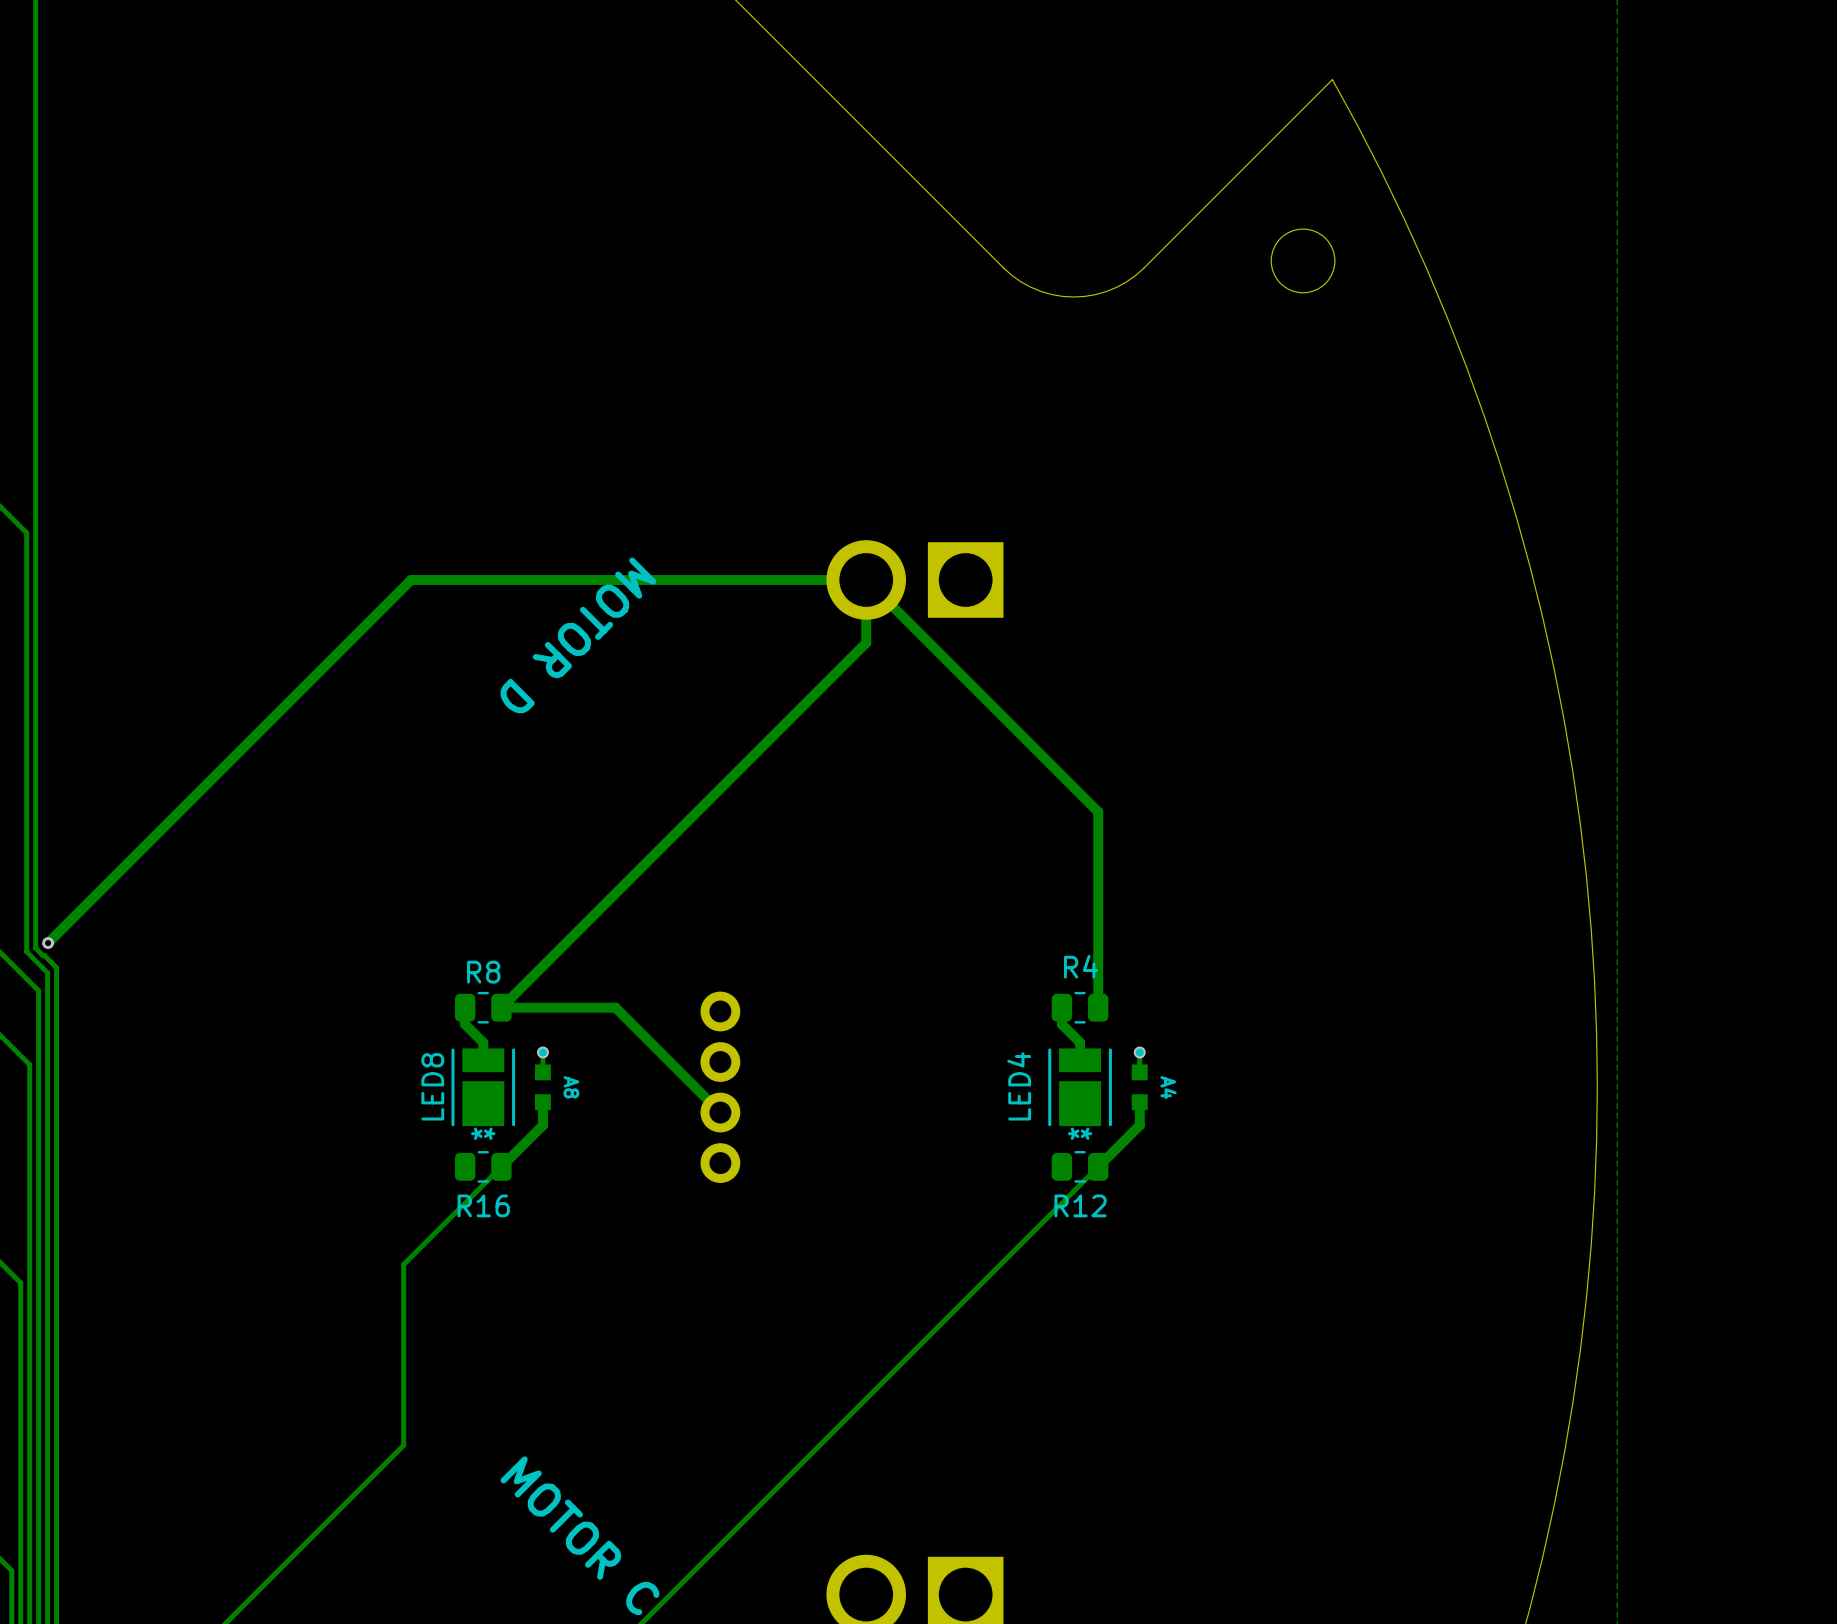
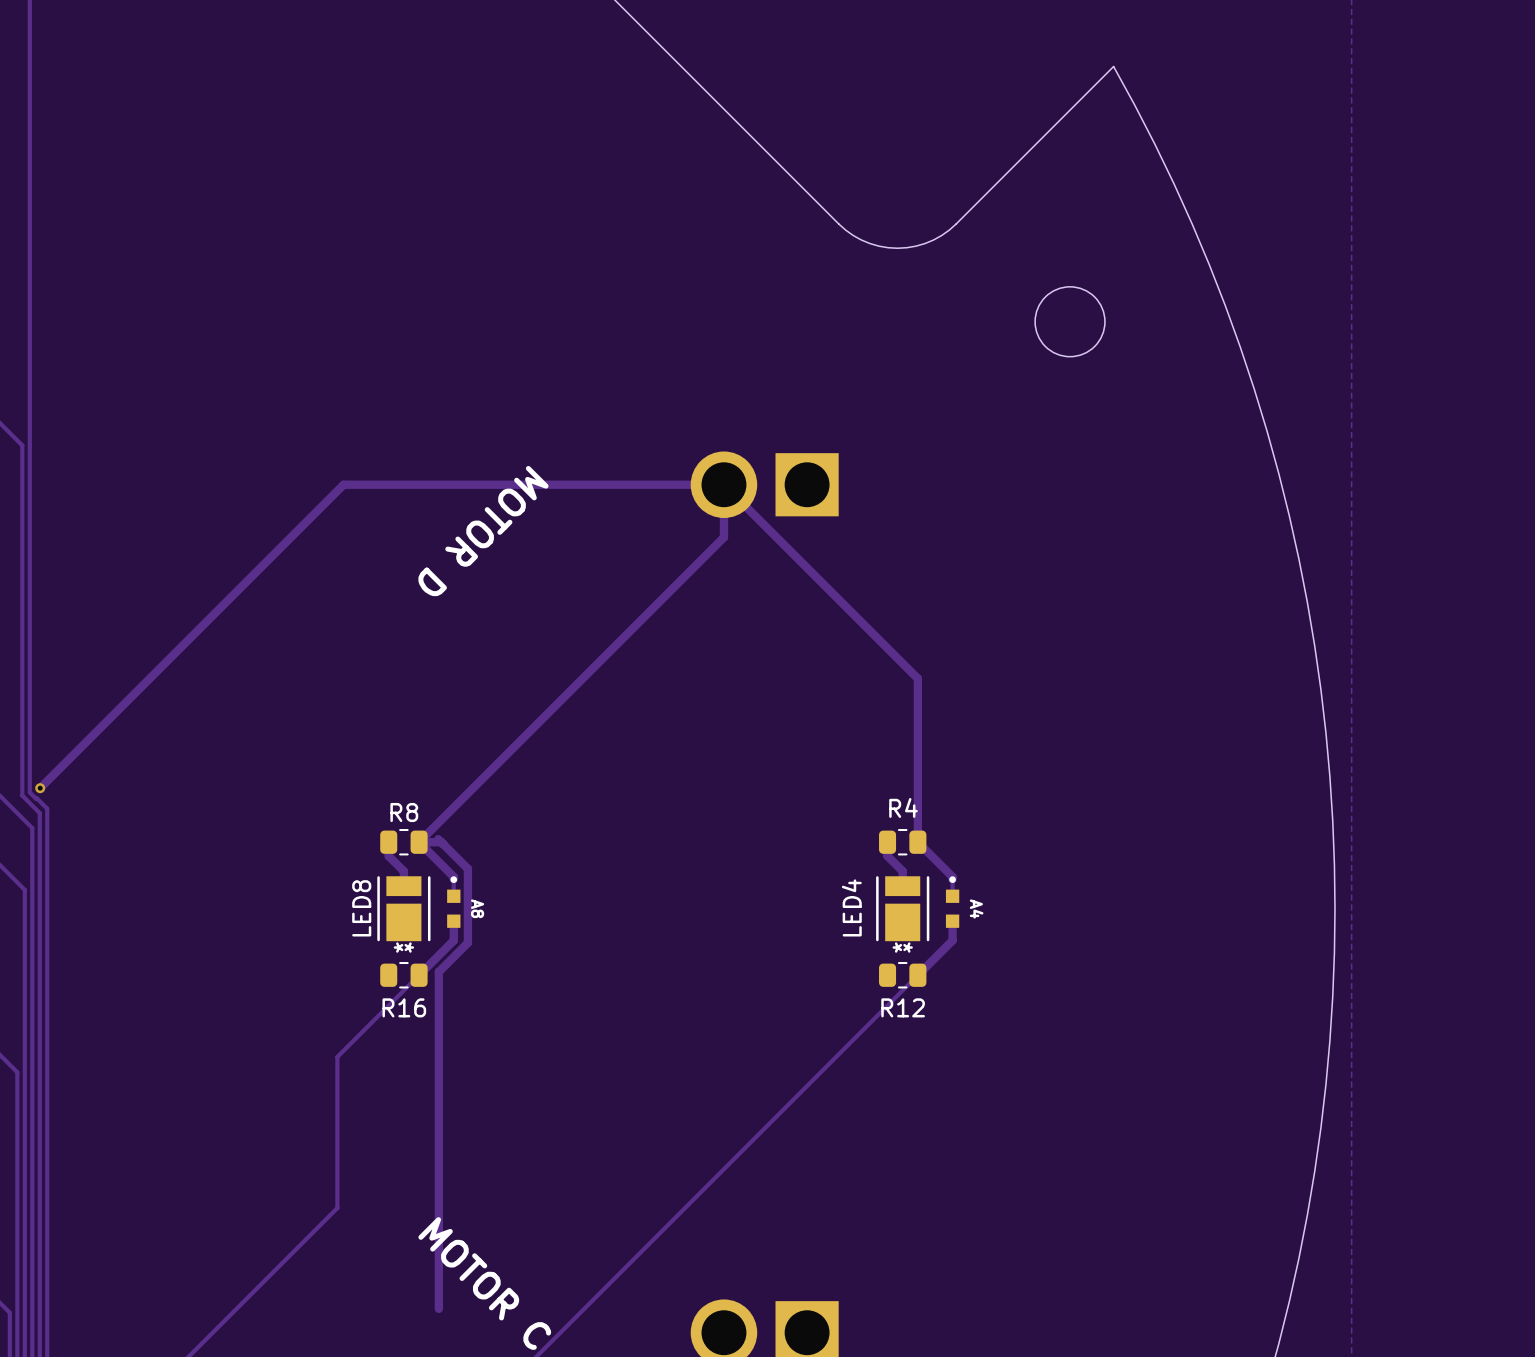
round board edge: [1270, 228, 1336, 294] -> none
round board edge: none -> [1035, 286, 1106, 357]
track: none -> (438, 839) (467, 868) (467, 942) (438, 971) (438, 1308)
track: none -> (419, 842) (453, 876) (453, 879)
track: (528, 1007) (615, 1007) (720, 1112) -> none
track: none -> (917, 842) (952, 876) (952, 879)
via: (542, 1052) -> none
via: (1139, 1052) -> none
part: (720, 1087) -> none

